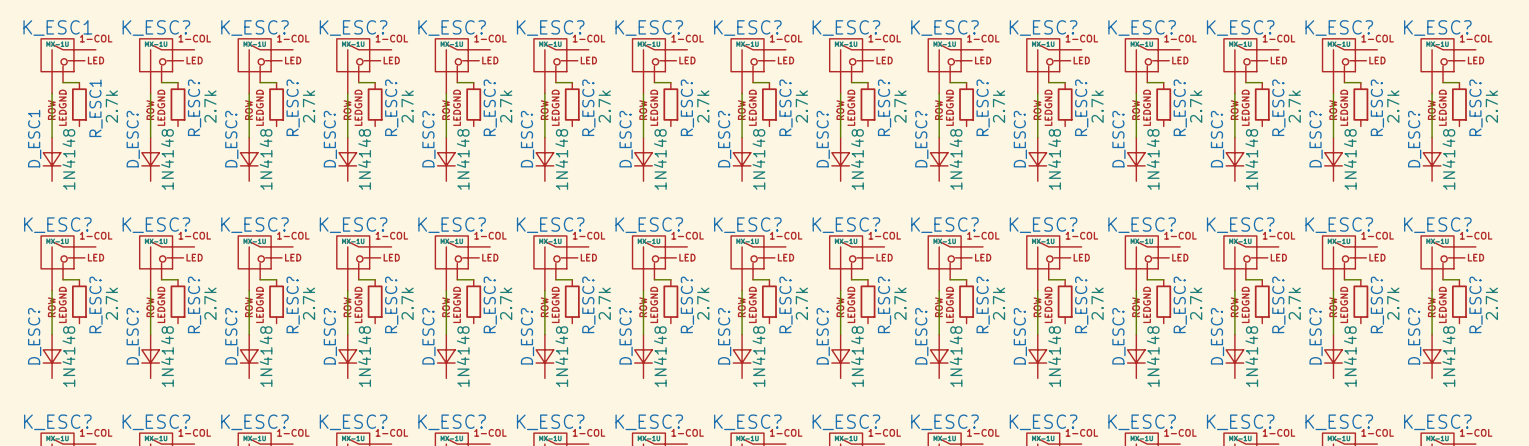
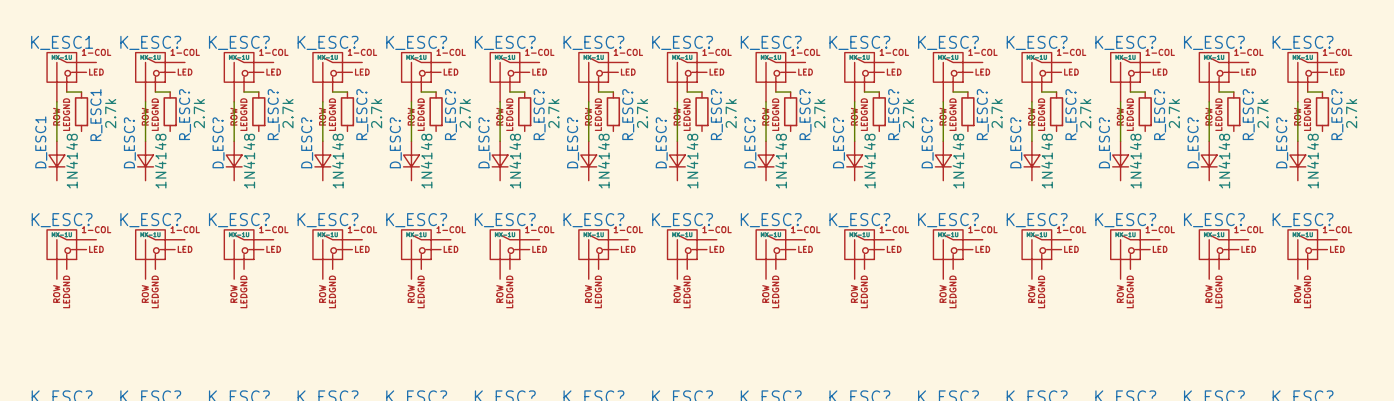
wire: (63, 279) (79, 279) -> none
wire: (161, 279) (178, 279) -> none
wire: (260, 279) (276, 279) -> none
wire: (358, 279) (375, 279) -> none
wire: (457, 279) (473, 279) -> none
wire: (555, 279) (572, 279) -> none
wire: (654, 279) (670, 279) -> none
wire: (753, 279) (769, 279) -> none
wire: (851, 279) (868, 279) -> none
wire: (950, 279) (966, 279) -> none
wire: (1048, 279) (1065, 279) -> none
wire: (1147, 279) (1163, 279) -> none
wire: (1245, 279) (1262, 279) -> none
wire: (1344, 279) (1360, 279) -> none
wire: (1443, 279) (1459, 279) -> none
wire: (52, 290) (52, 334) -> none
wire: (150, 290) (150, 334) -> none
wire: (249, 290) (249, 334) -> none
wire: (347, 290) (347, 334) -> none
wire: (446, 290) (446, 334) -> none
wire: (544, 290) (544, 334) -> none
wire: (643, 290) (643, 334) -> none
wire: (742, 290) (742, 334) -> none
wire: (840, 290) (840, 334) -> none
wire: (939, 290) (939, 334) -> none
wire: (1037, 290) (1037, 334) -> none
wire: (1136, 290) (1136, 334) -> none
wire: (1234, 290) (1234, 334) -> none
wire: (1333, 290) (1333, 334) -> none
wire: (1432, 290) (1432, 334) -> none
R_ESC?: 2.7k (79, 301) -> none
R_ESC?: 2.7k (178, 301) -> none
R_ESC?: 2.7k (276, 301) -> none
R_ESC?: 2.7k (375, 301) -> none
R_ESC?: 2.7k (473, 301) -> none
R_ESC?: 2.7k (572, 301) -> none
R_ESC?: 2.7k (670, 301) -> none
R_ESC?: 2.7k (769, 301) -> none
R_ESC?: 2.7k (868, 301) -> none
R_ESC?: 2.7k (966, 301) -> none
R_ESC?: 2.7k (1065, 301) -> none
R_ESC?: 2.7k (1163, 301) -> none
R_ESC?: 2.7k (1262, 301) -> none
R_ESC?: 2.7k (1360, 301) -> none
R_ESC?: 2.7k (1459, 301) -> none
D_ESC?: 1N4148 (52, 356) -> none
D_ESC?: 1N4148 (150, 356) -> none
D_ESC?: 1N4148 (249, 356) -> none
D_ESC?: 1N4148 (347, 356) -> none
D_ESC?: 1N4148 (446, 356) -> none
D_ESC?: 1N4148 (544, 356) -> none
D_ESC?: 1N4148 (643, 356) -> none
D_ESC?: 1N4148 (742, 356) -> none
D_ESC?: 1N4148 (840, 356) -> none
D_ESC?: 1N4148 (939, 356) -> none
D_ESC?: 1N4148 (1037, 356) -> none
D_ESC?: 1N4148 (1136, 356) -> none
D_ESC?: 1N4148 (1234, 356) -> none
D_ESC?: 1N4148 (1333, 356) -> none
D_ESC?: 1N4148 (1432, 356) -> none

